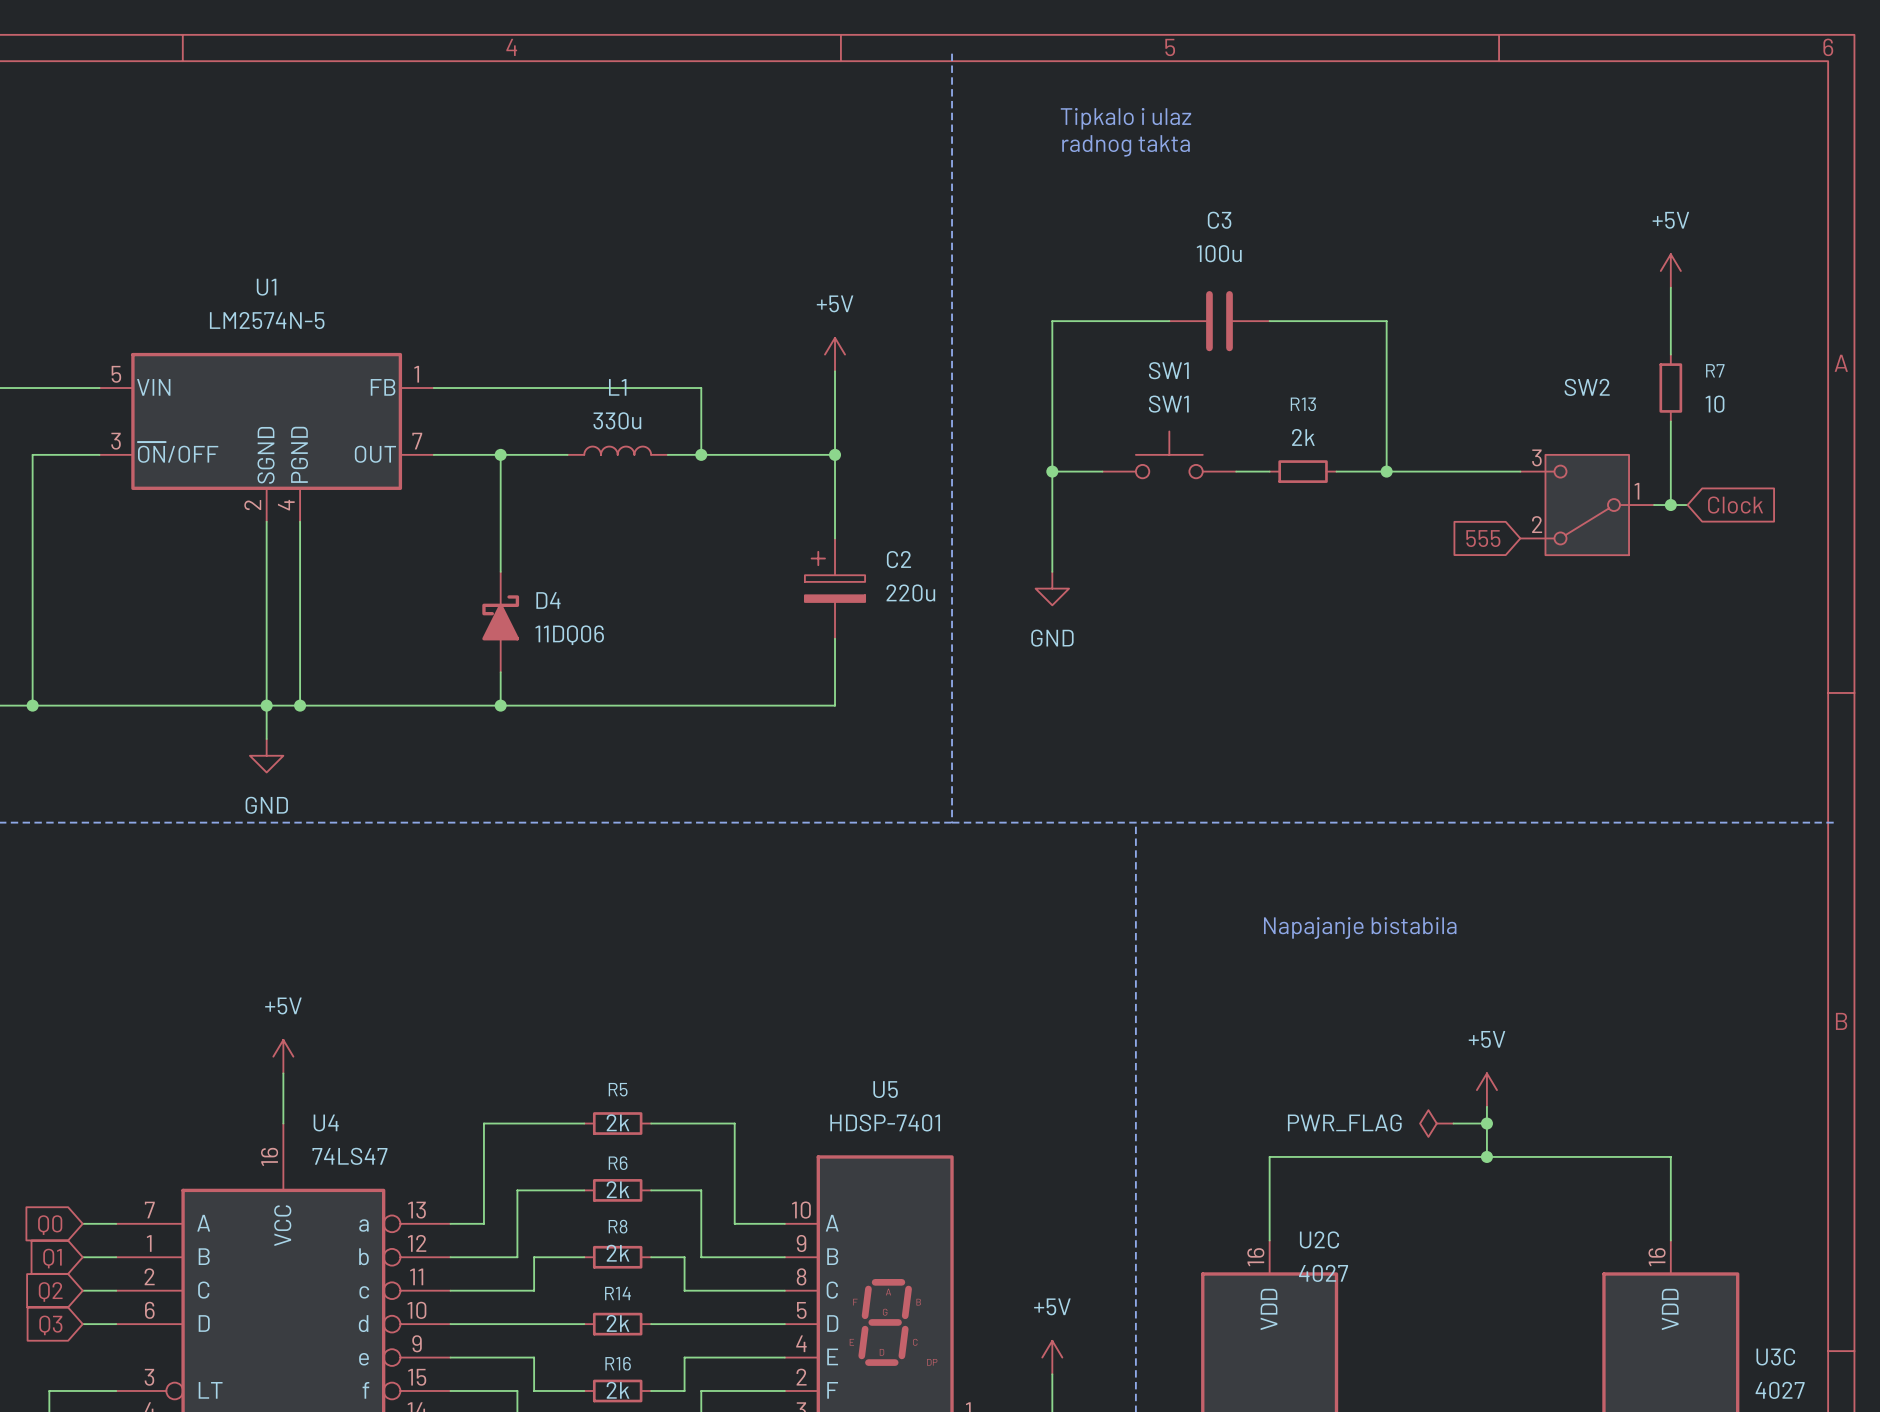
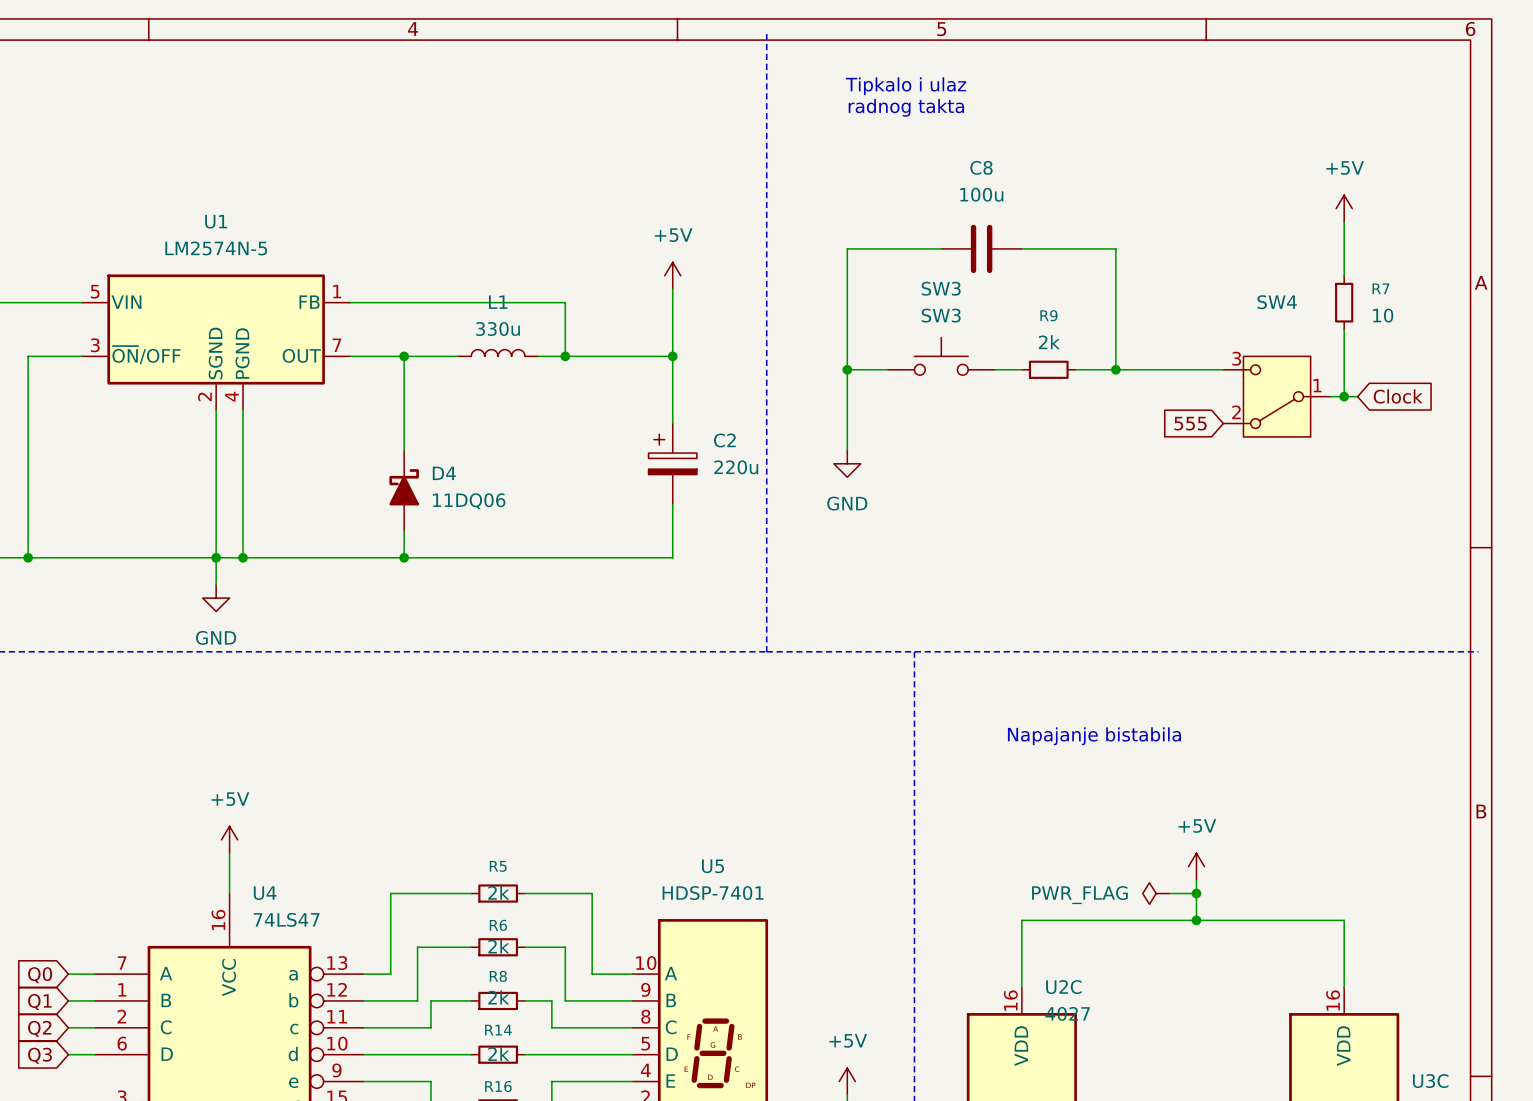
C3 name: C3 (1219, 220) -> C8 (981, 167)
SW1 name: SW1 (1168, 370) -> SW3 (941, 288)
SW2 name: SW2 (1587, 387) -> SW4 (1277, 302)
SW1 value: SW1 (1168, 404) -> SW3 (941, 315)
R13 name: R13 (1303, 404) -> R9 (1048, 315)

